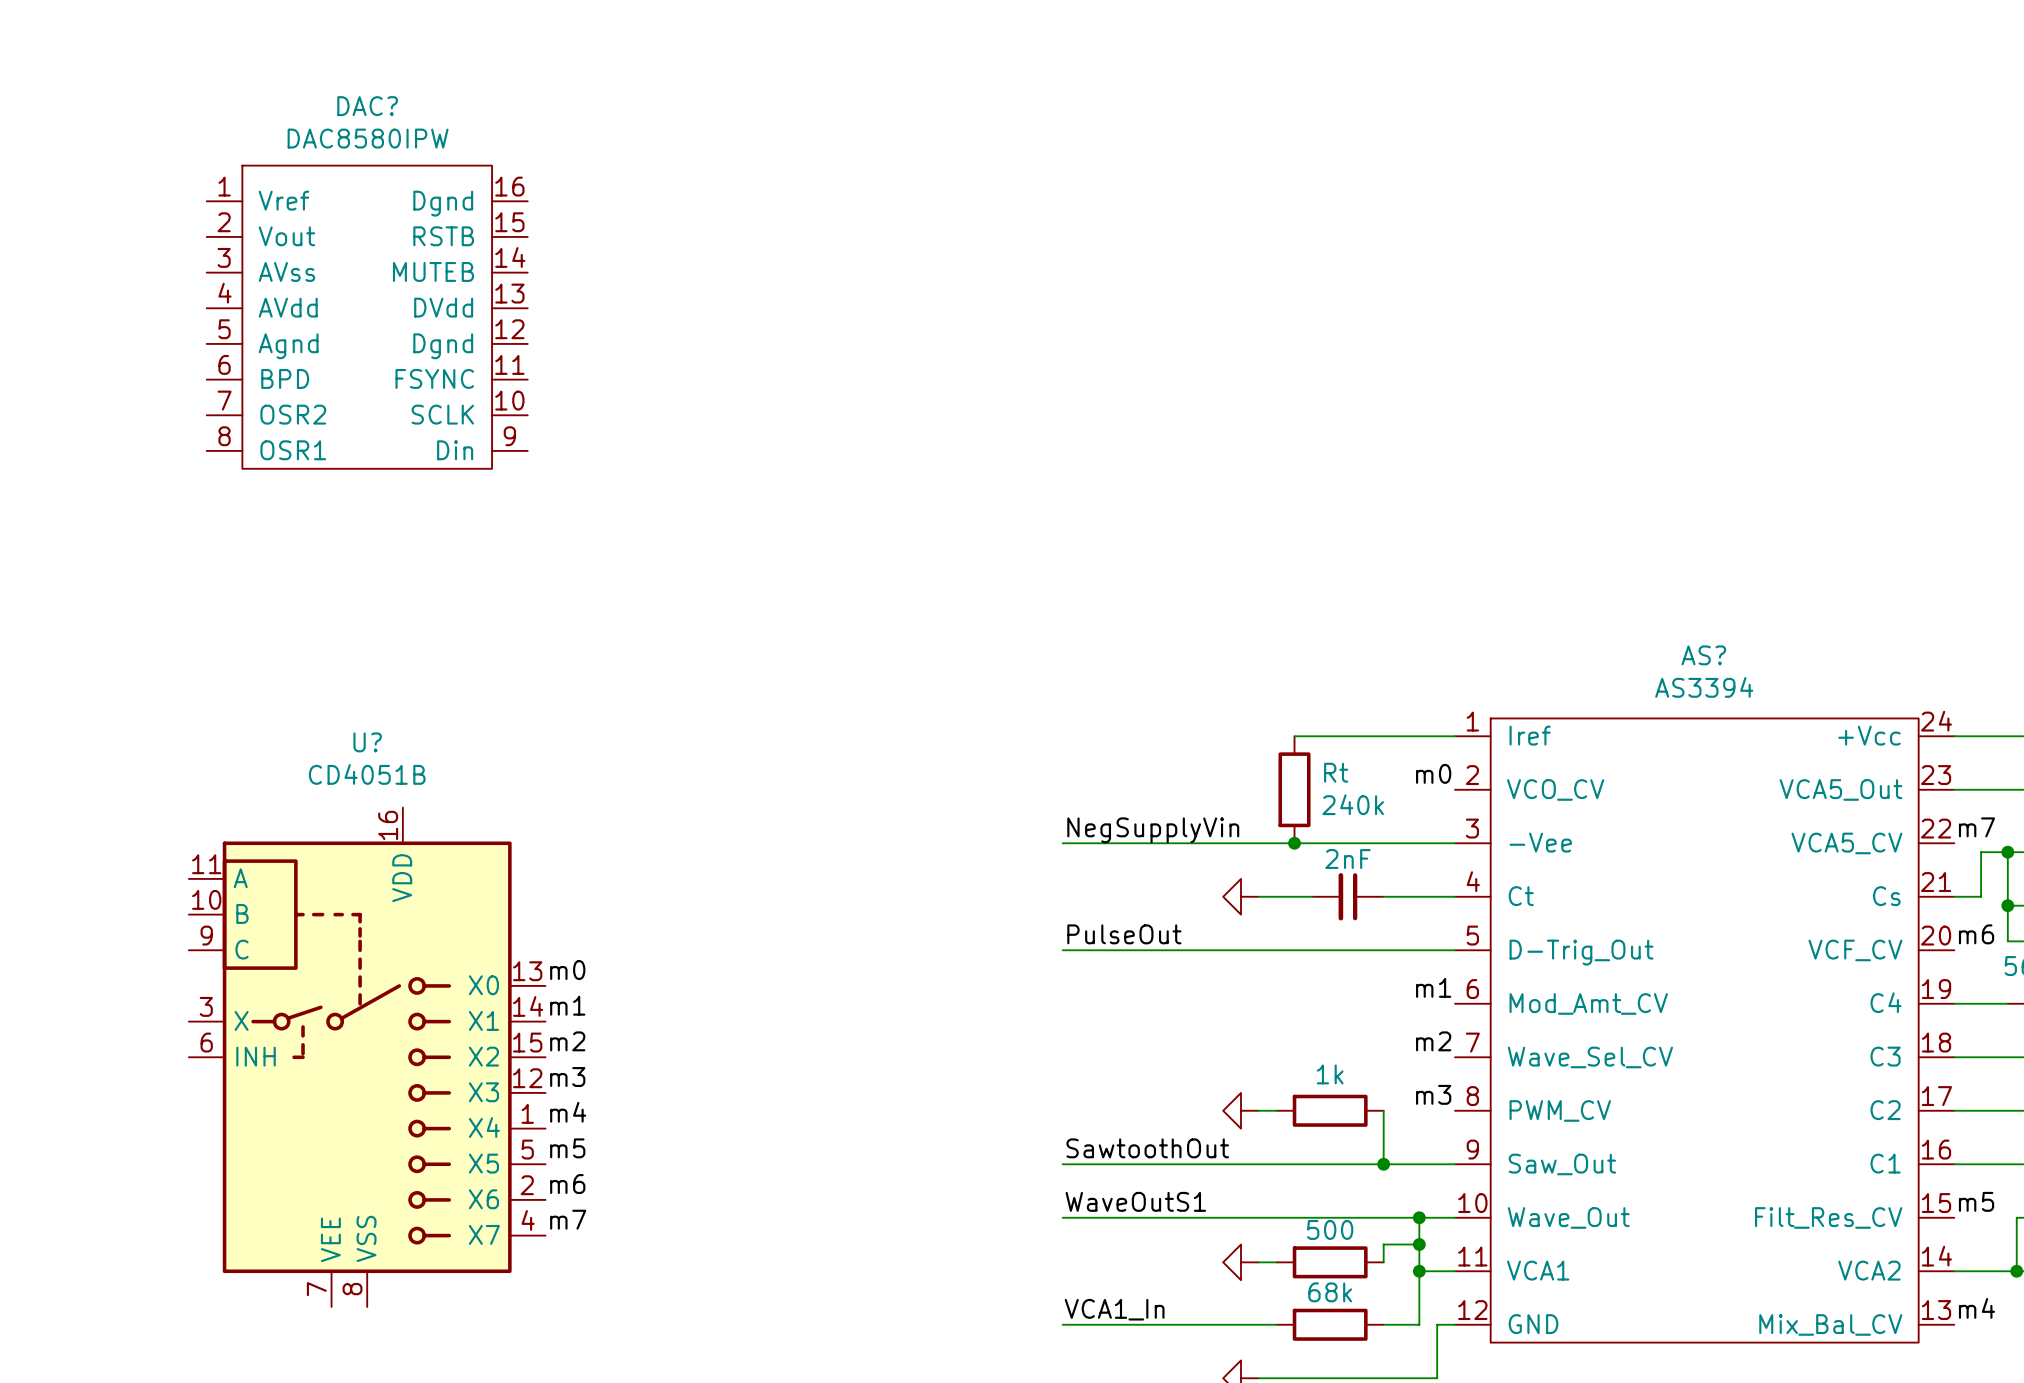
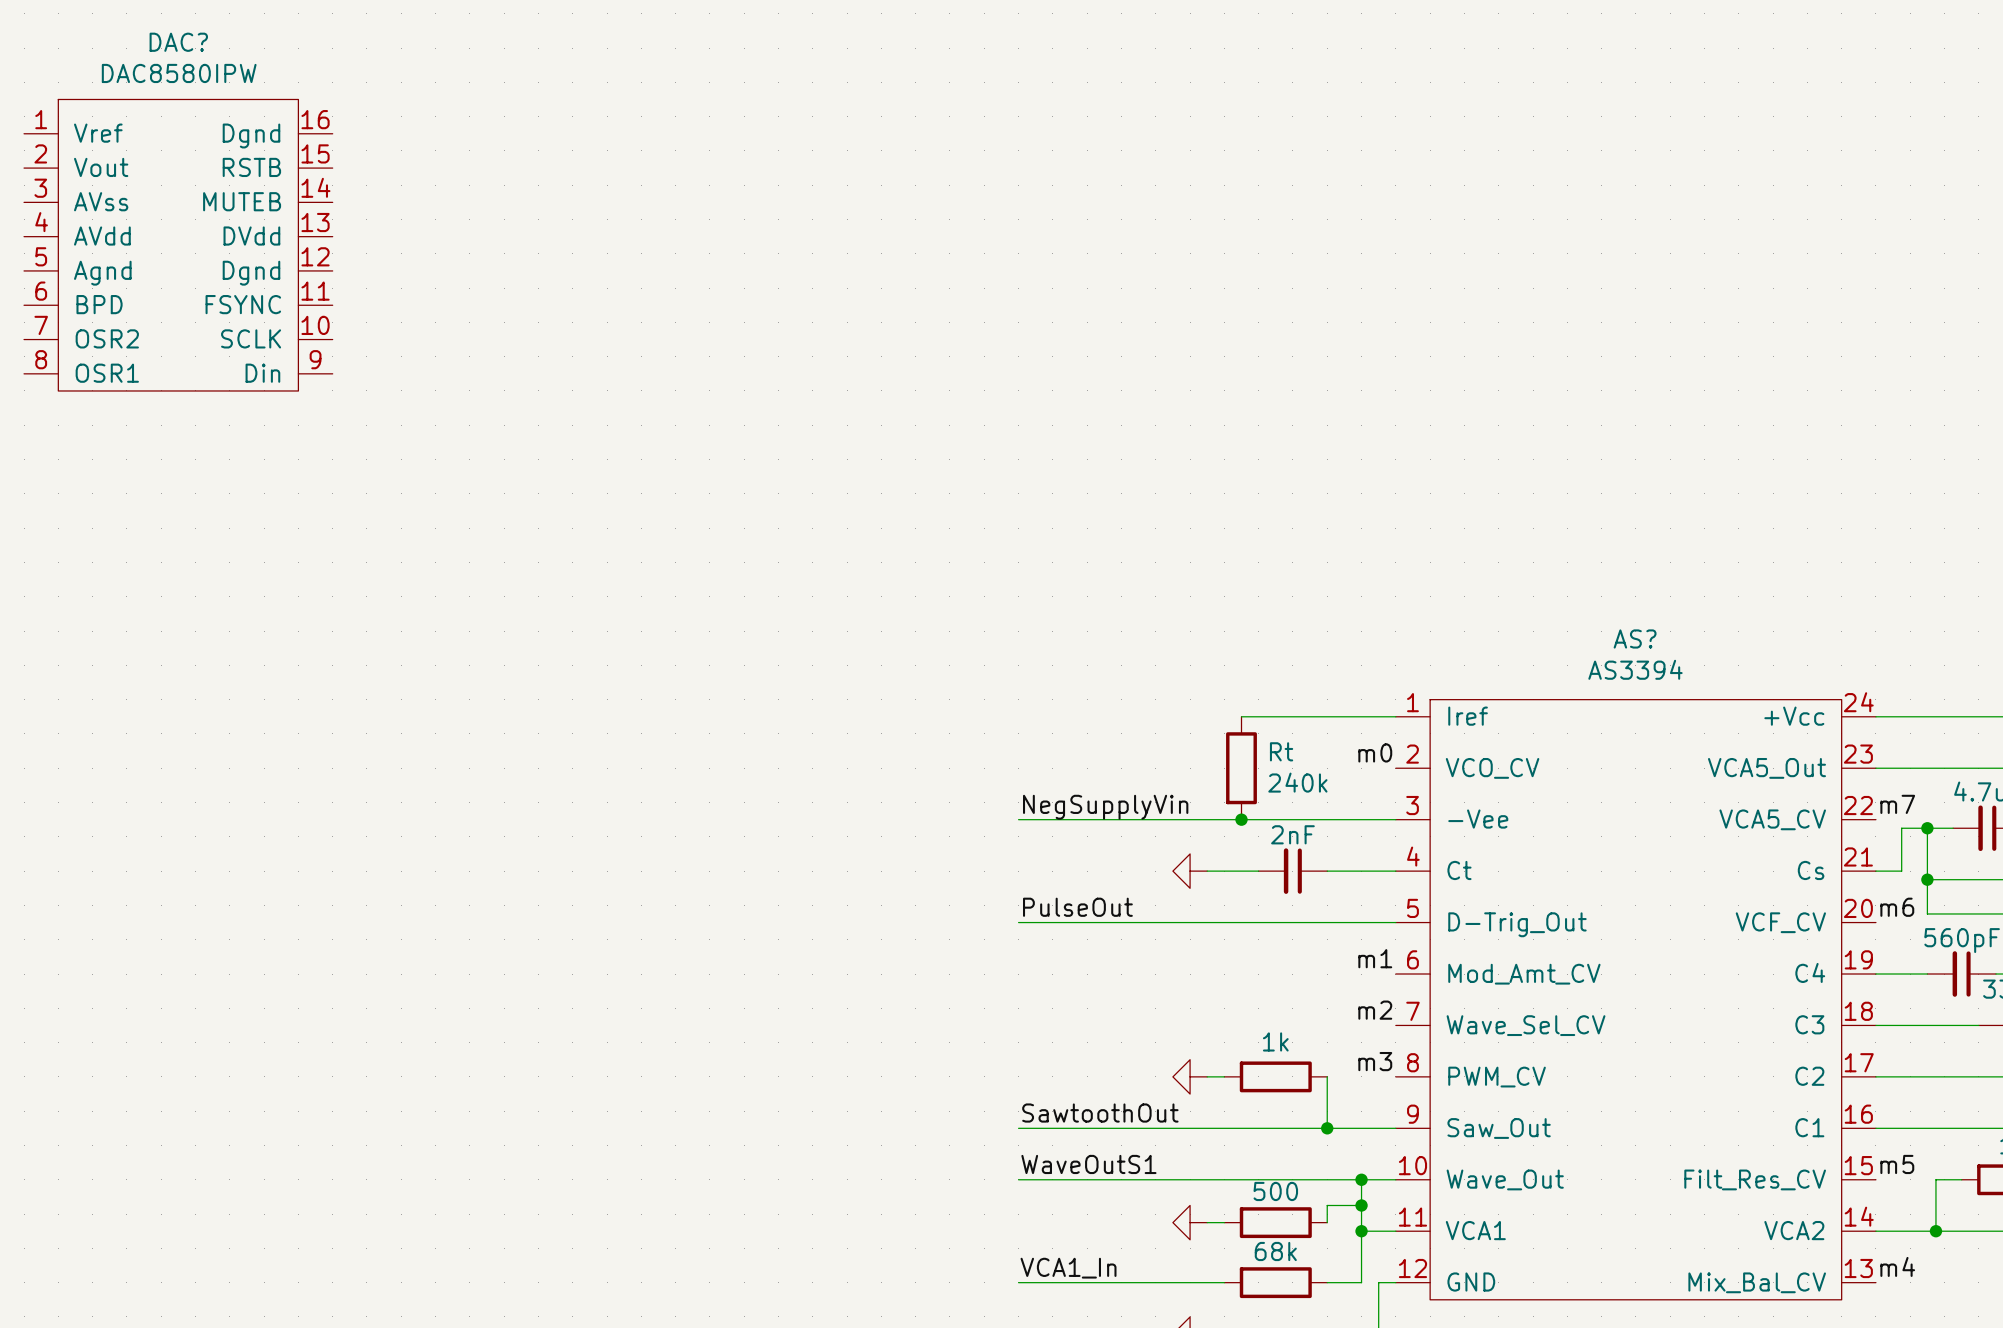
DAC? position: (367, 317) -> (178, 245)
label: m0 (567, 970) -> none
label: m1 (567, 1005) -> none
label: m2 (567, 1041) -> none
U?: CD4051B (367, 1057) -> none
label: m3 (567, 1077) -> none
label: m4 (568, 1112) -> none
label: m5 (567, 1148) -> none
label: m6 (567, 1184) -> none
label: m7 (568, 1219) -> none

